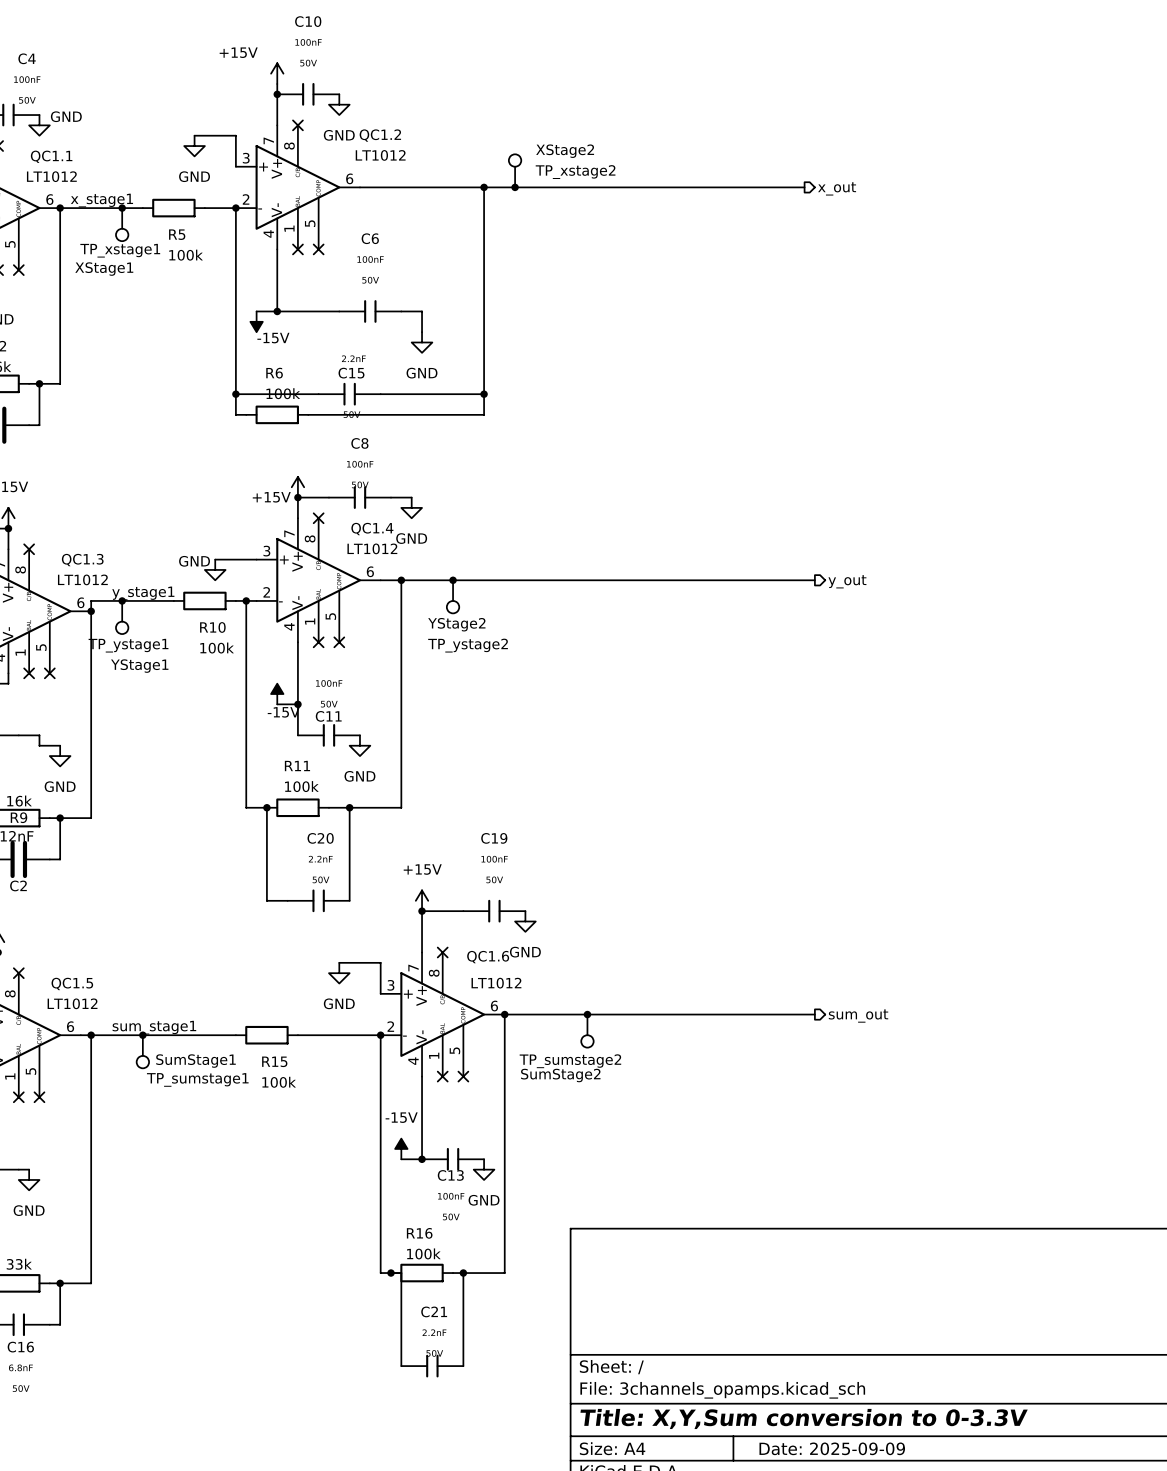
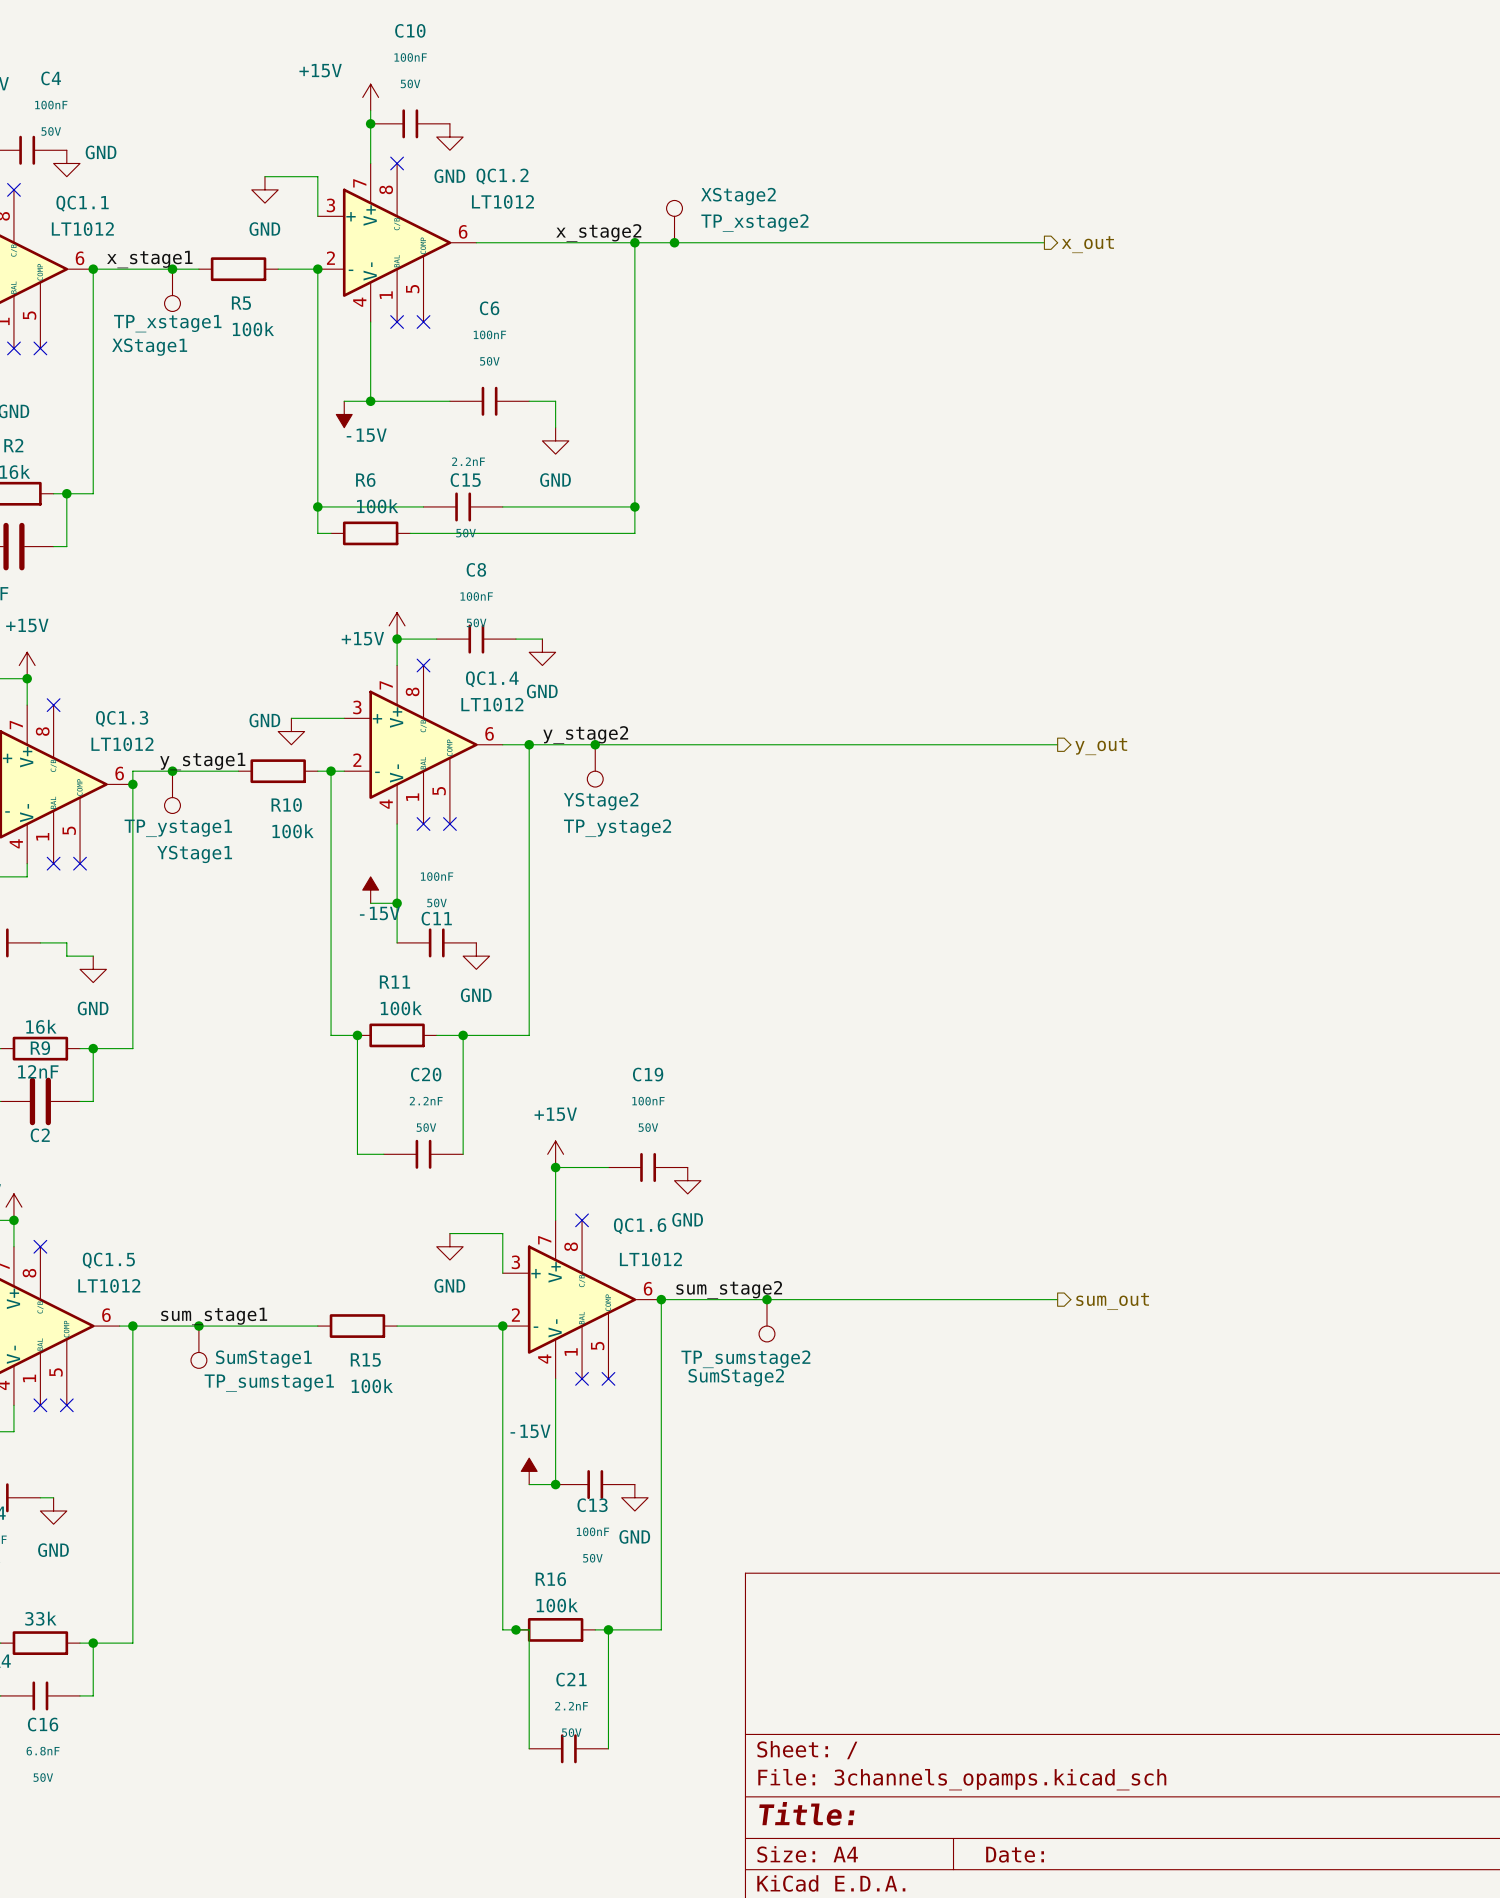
label: none -> x_stage2 (598, 232)
label: none -> y_stage2 (585, 734)
label: none -> sum_stage2 (729, 1289)
title block: Title: X,Y,Sum conversion to 0-3.3V (804, 1418) -> Title: (806, 1813)
title block: Date: 2025-09-09 (832, 1448) -> Date: (1015, 1854)

